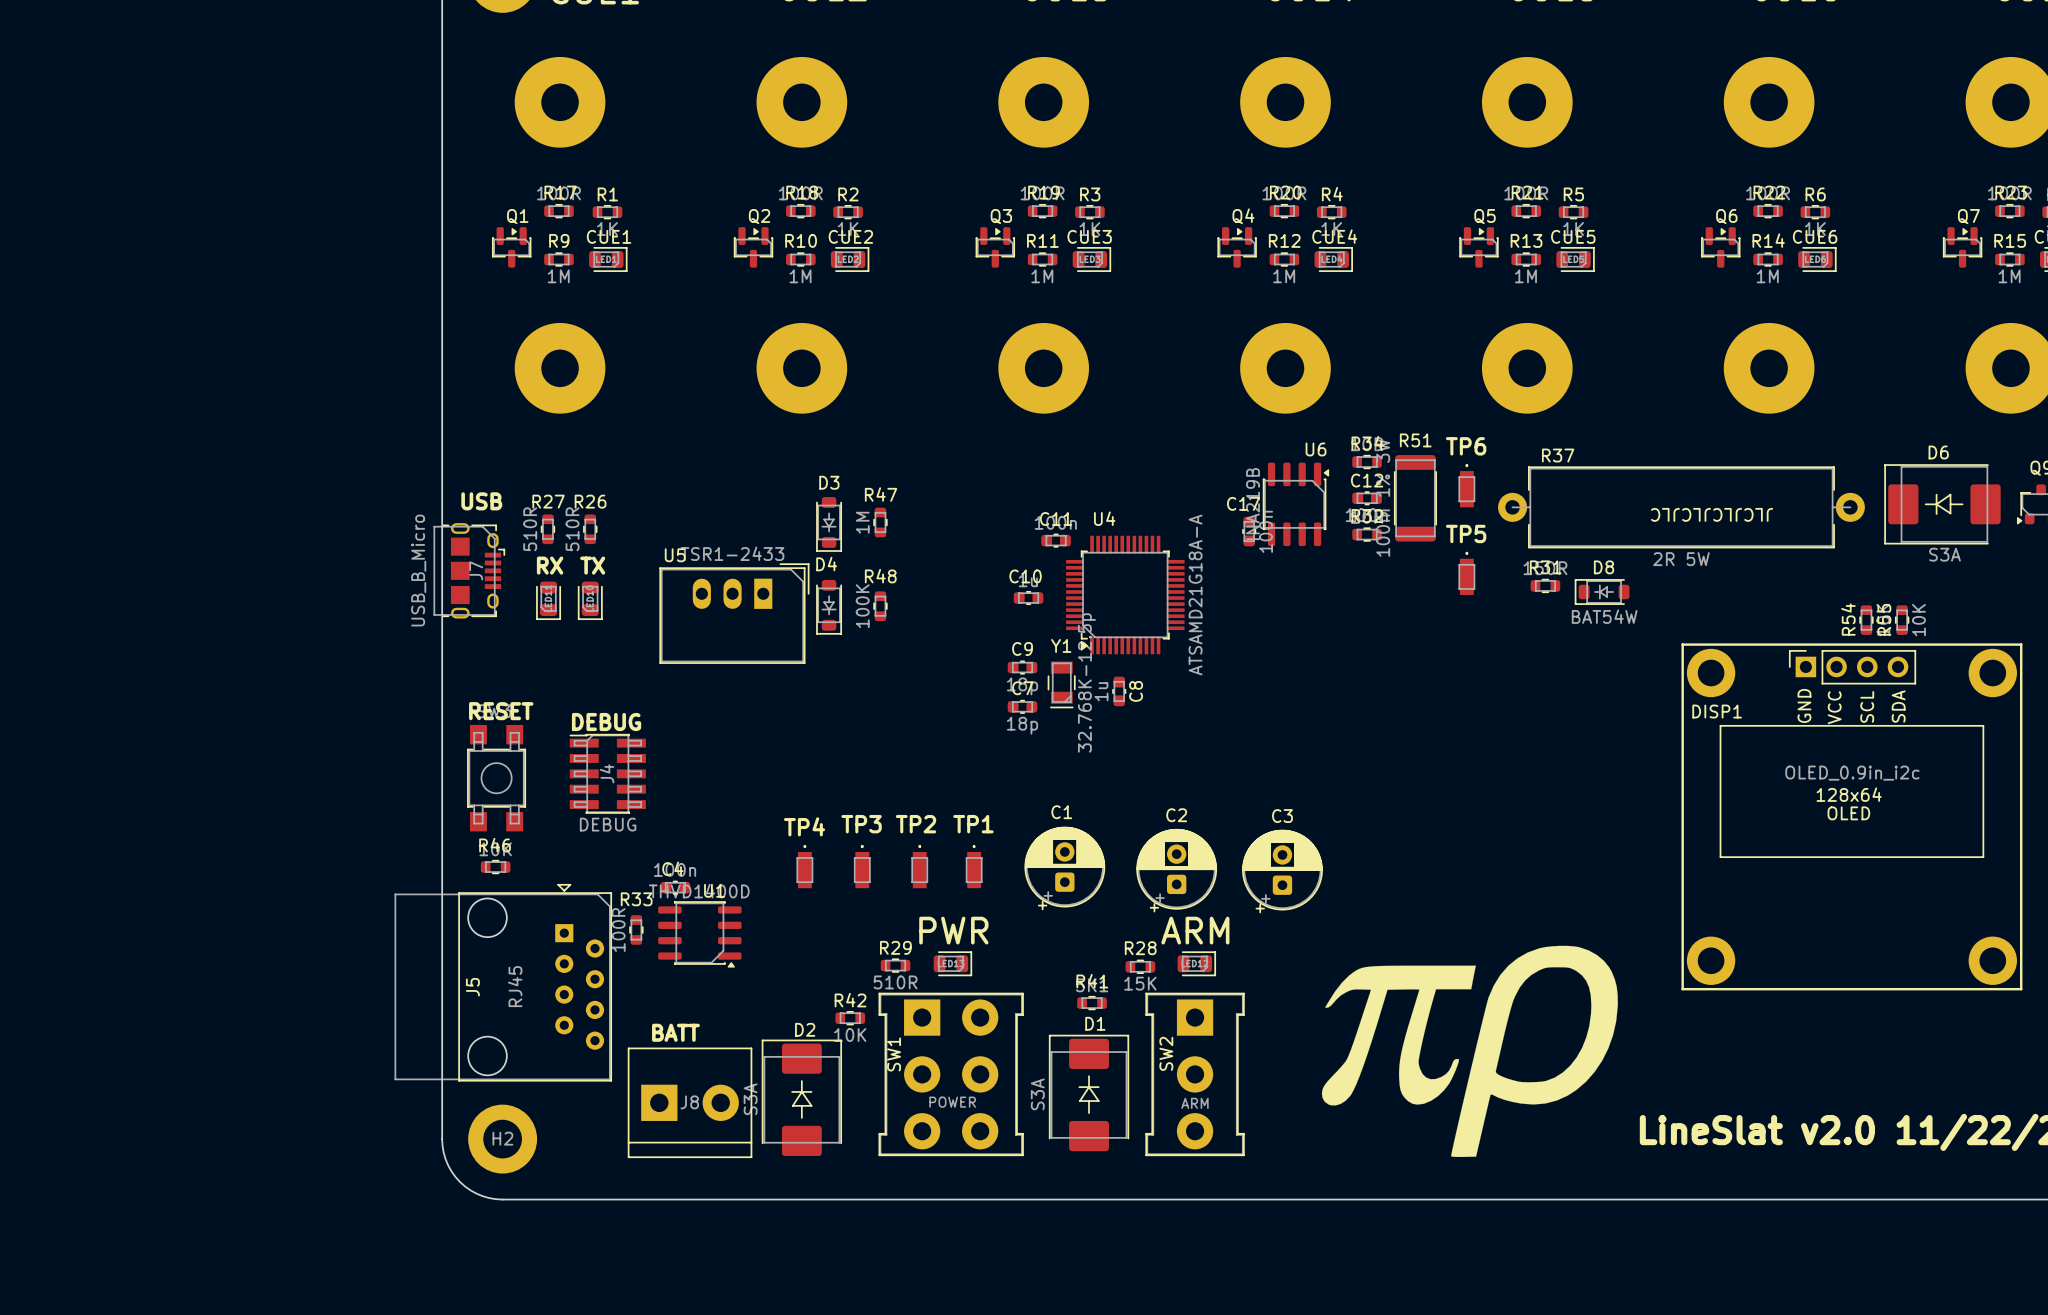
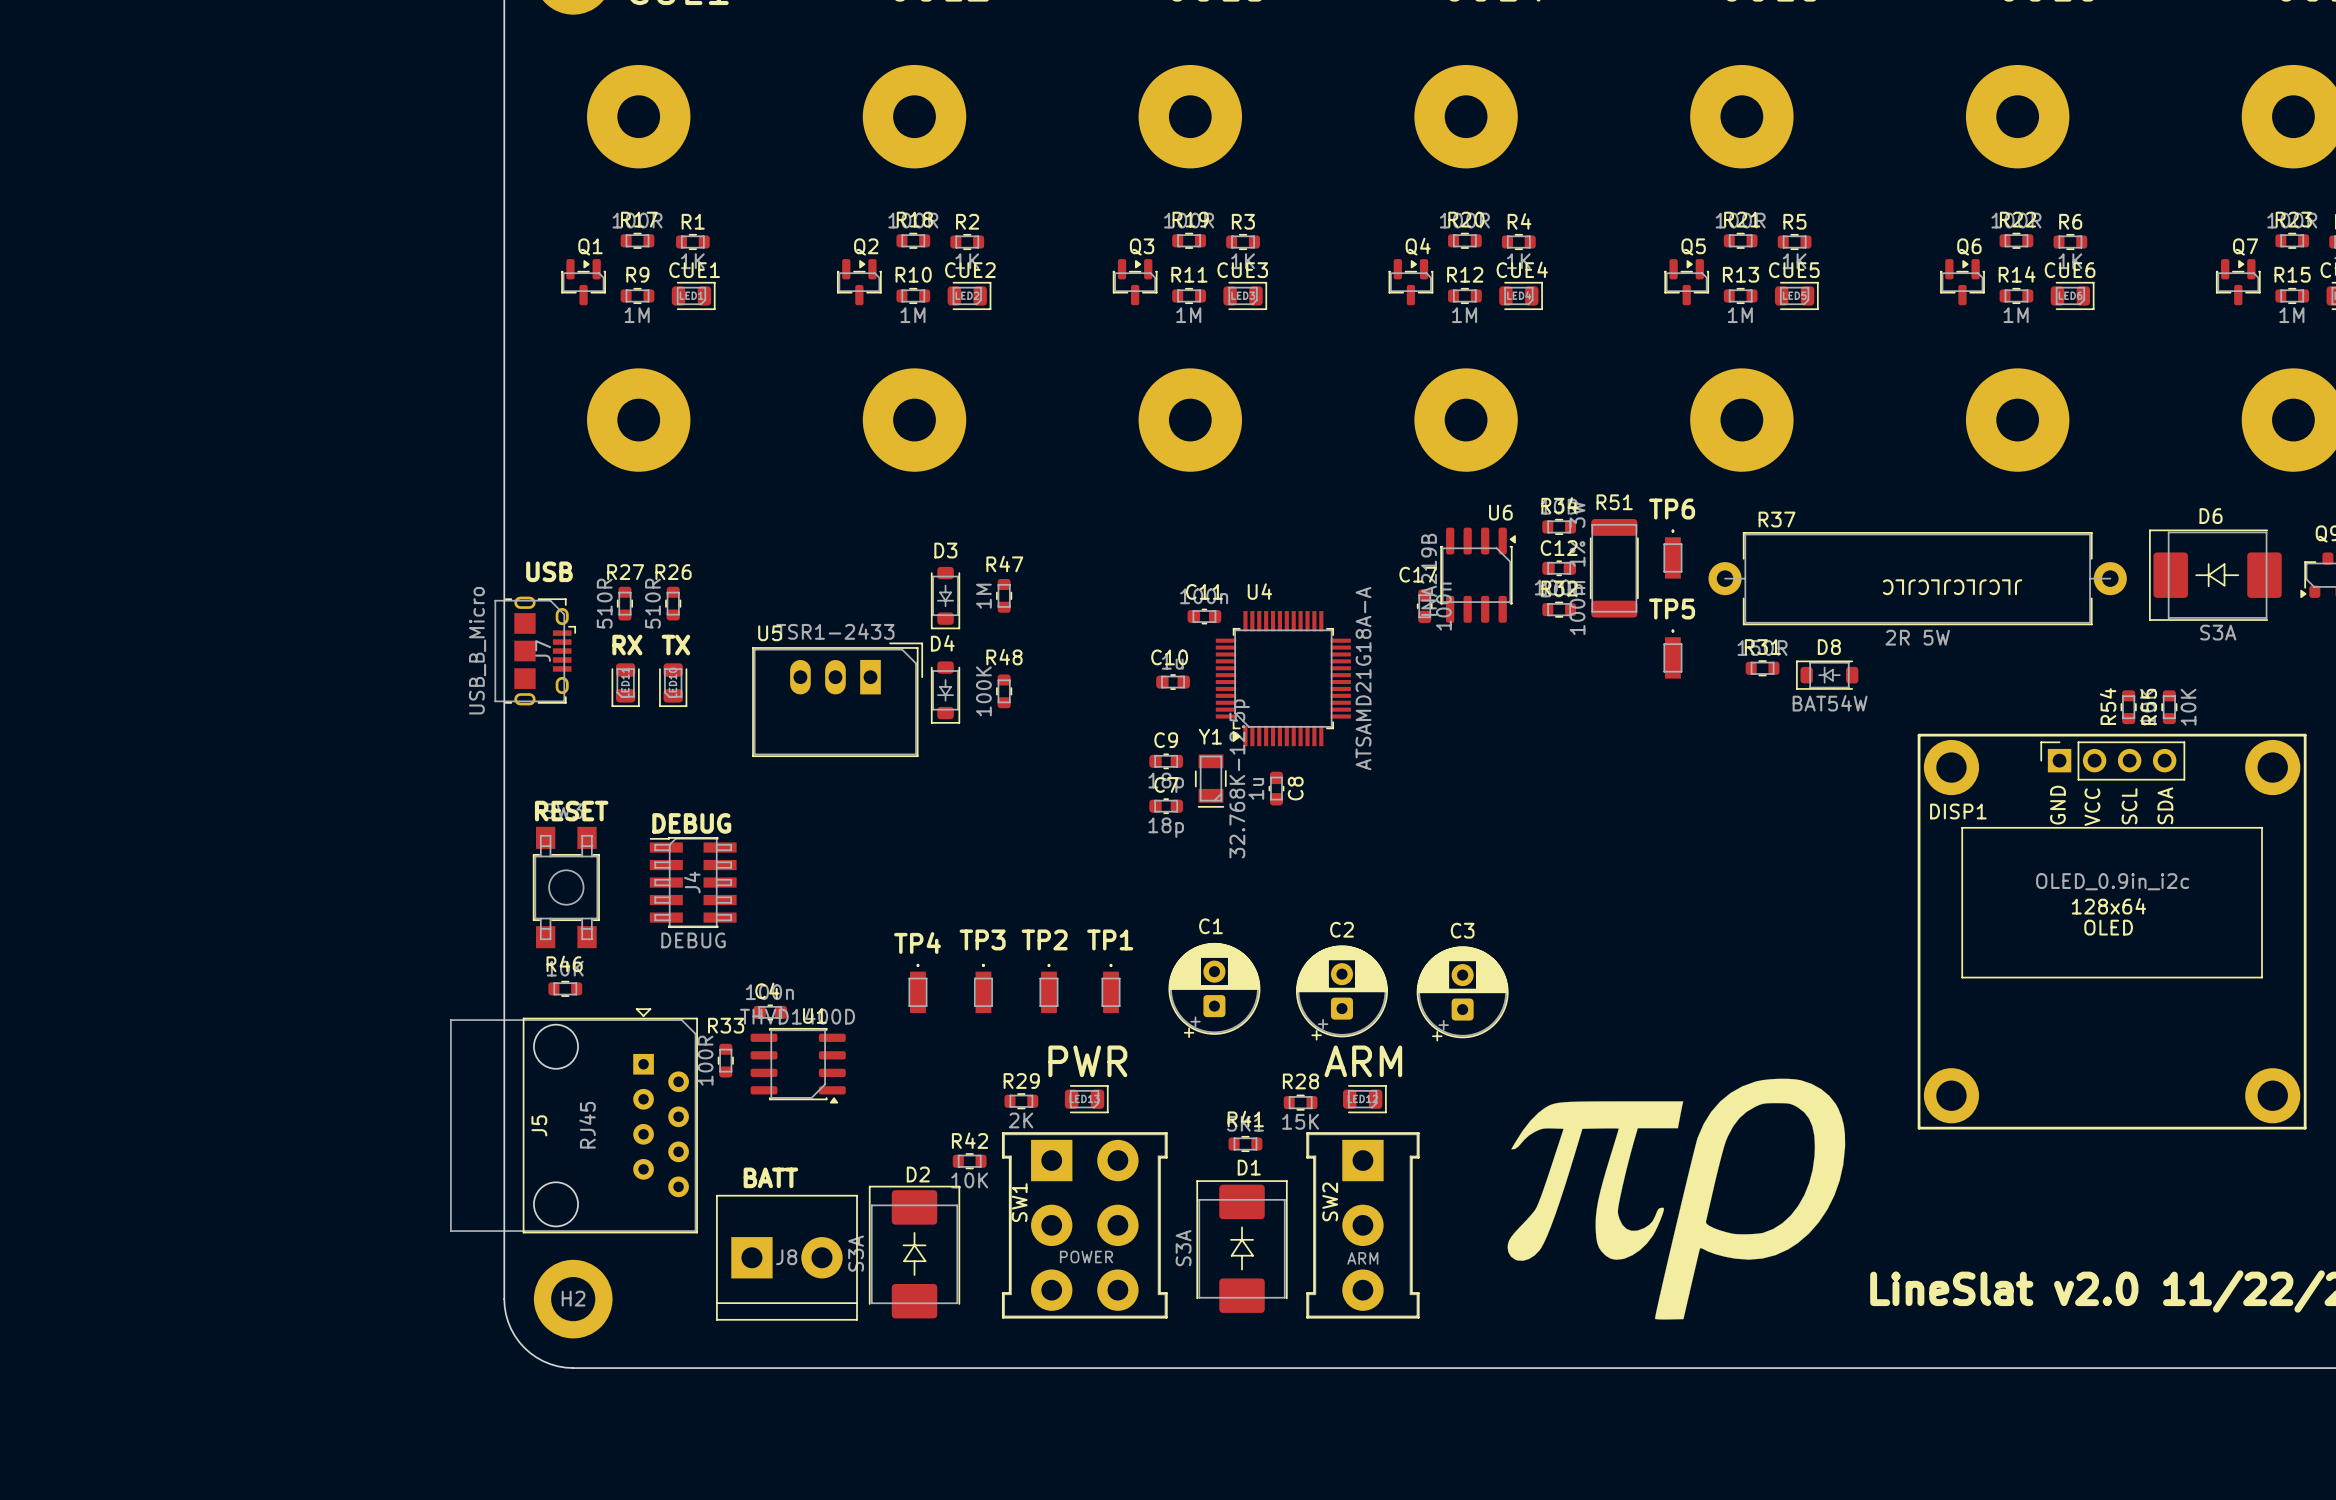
R29 value: 510R (895, 982) -> 2K (1021, 1120)

